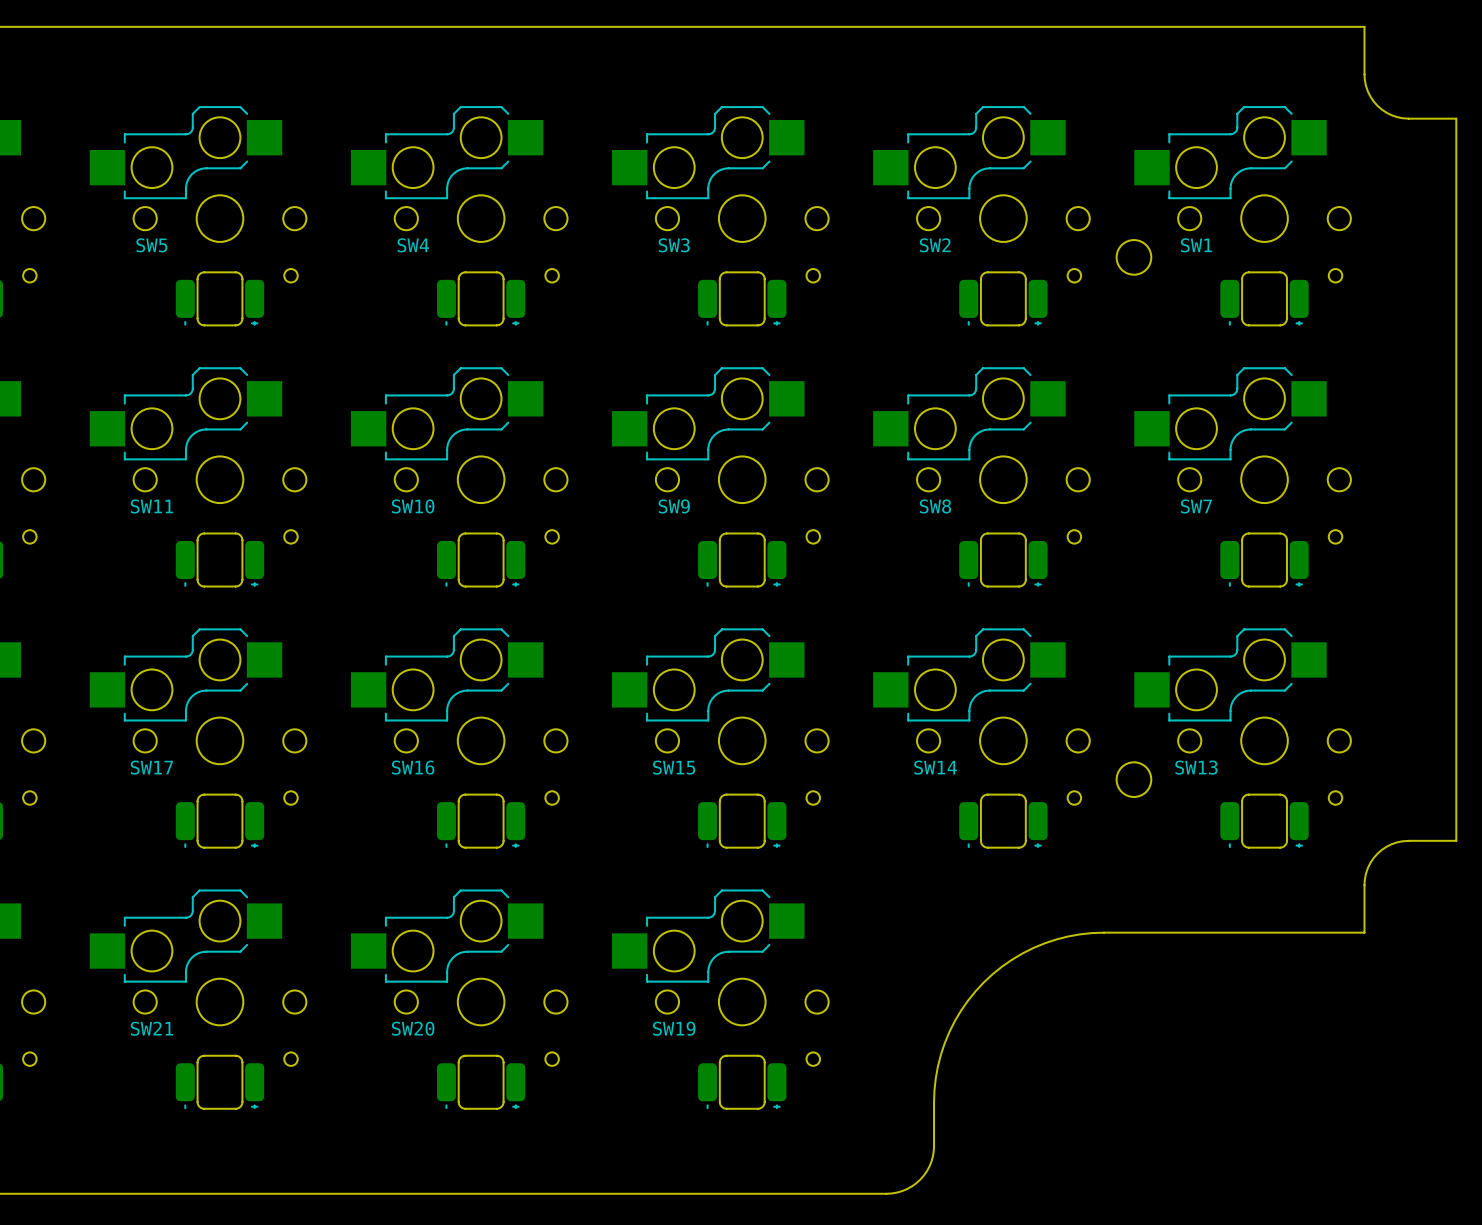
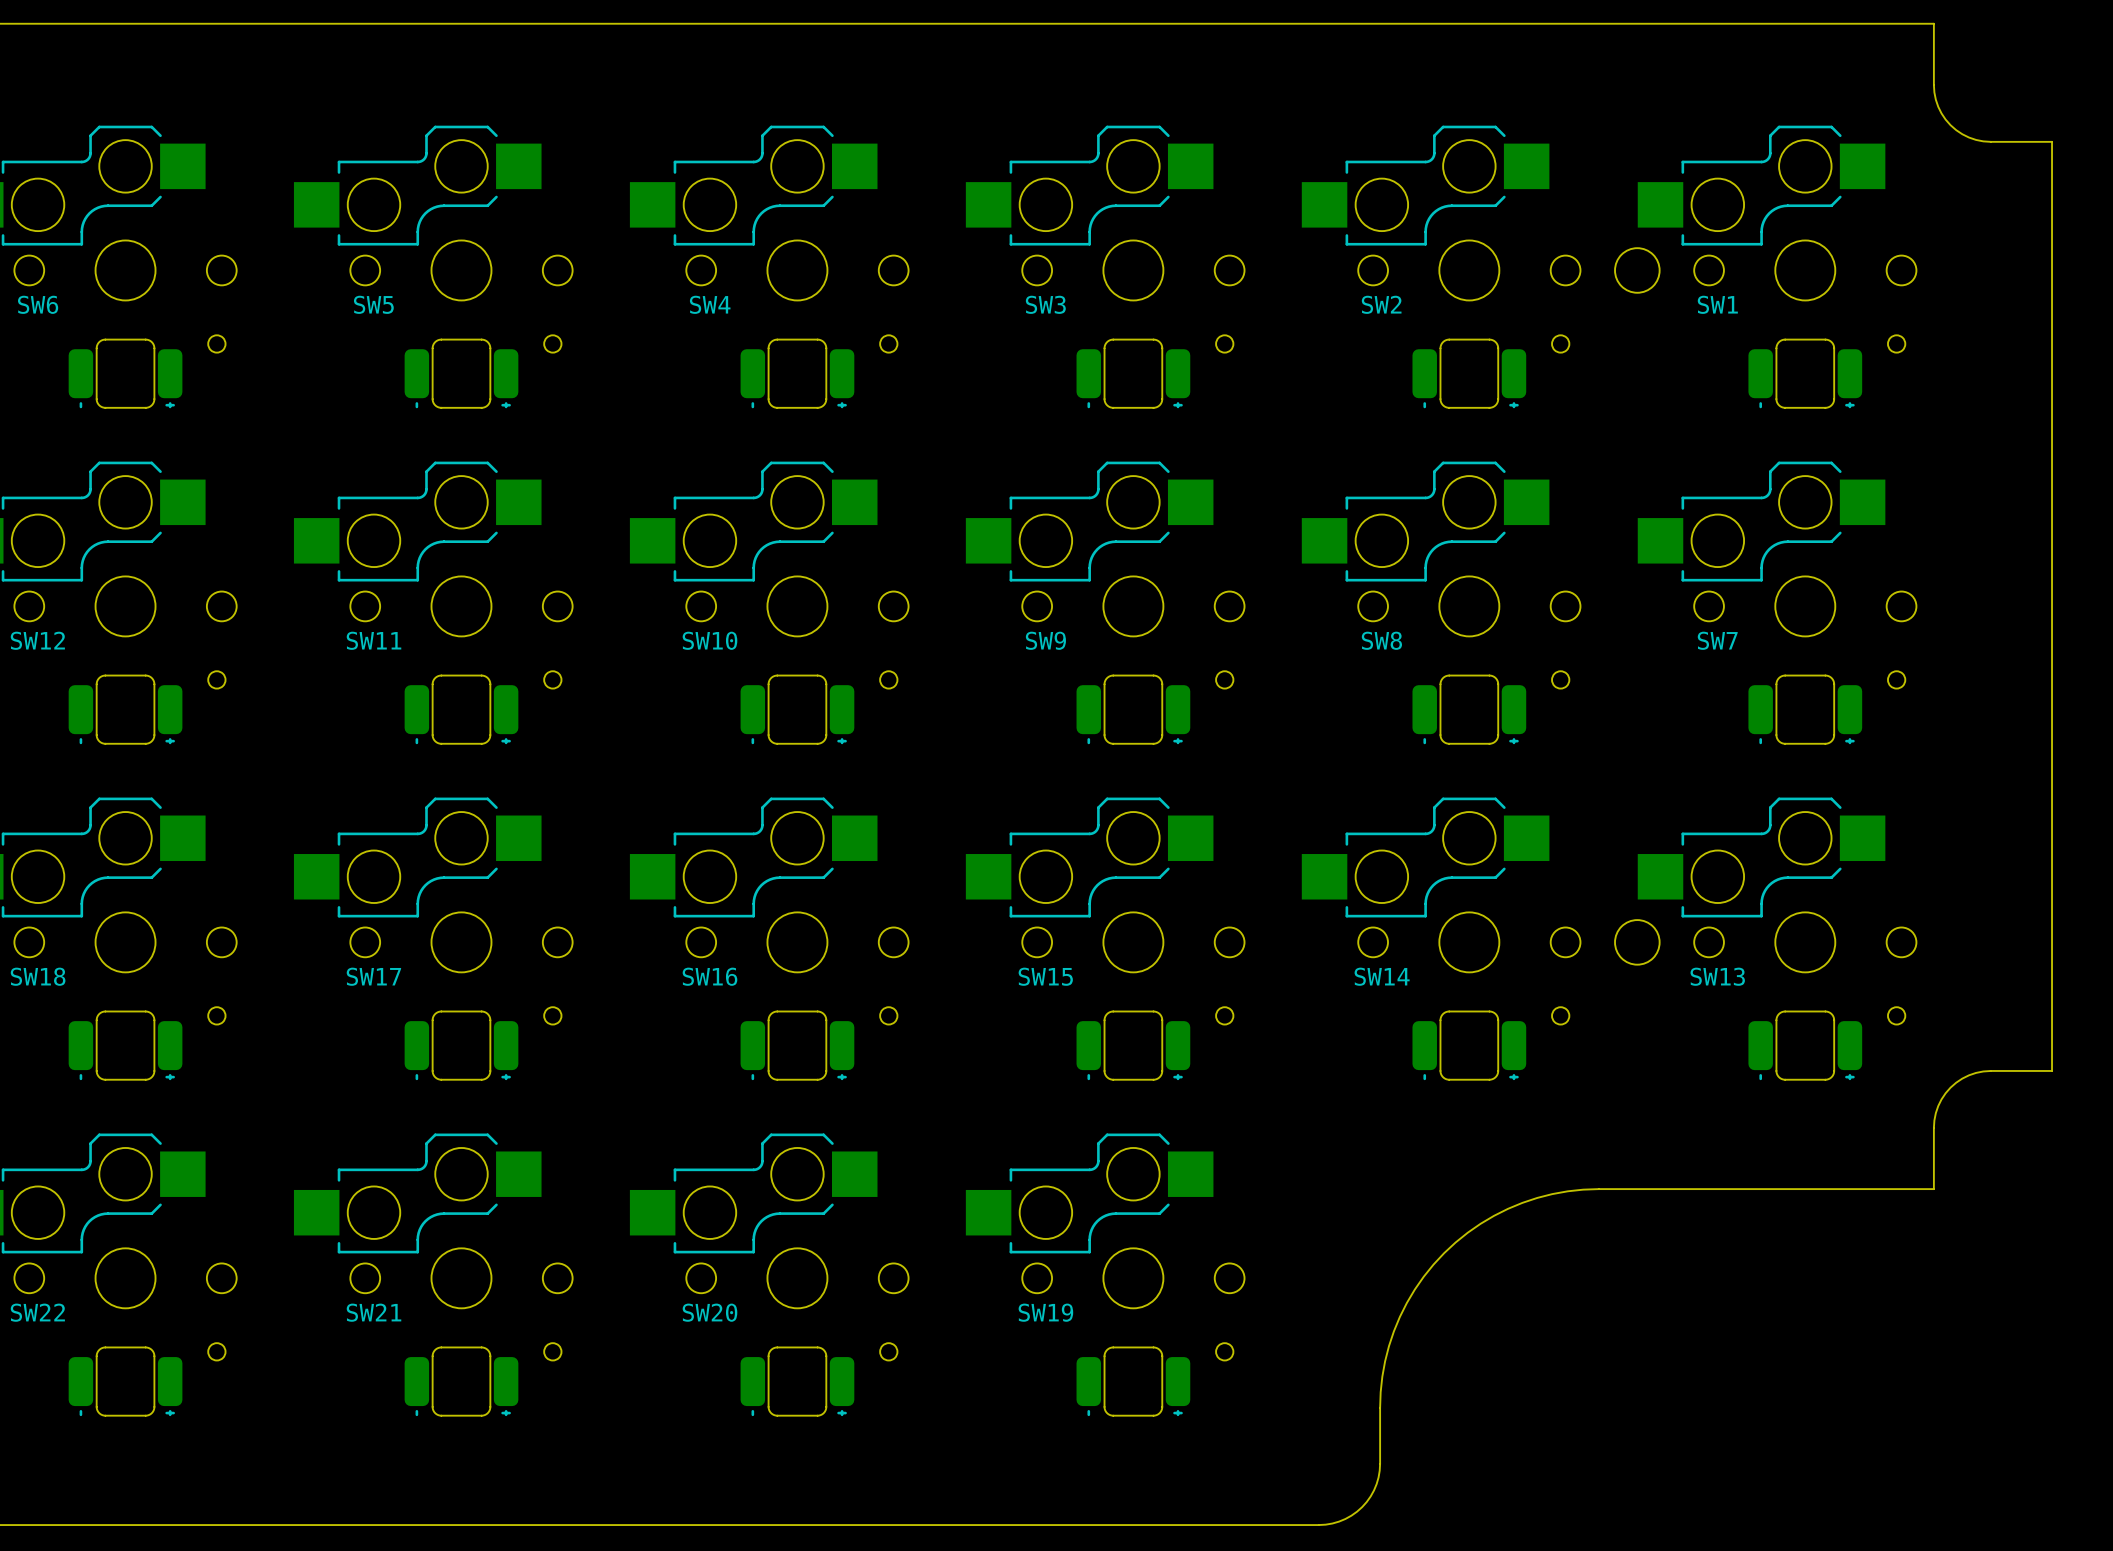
round board edge position: (1133, 257) -> (1637, 270)
round board edge position: (1133, 779) -> (1637, 942)

